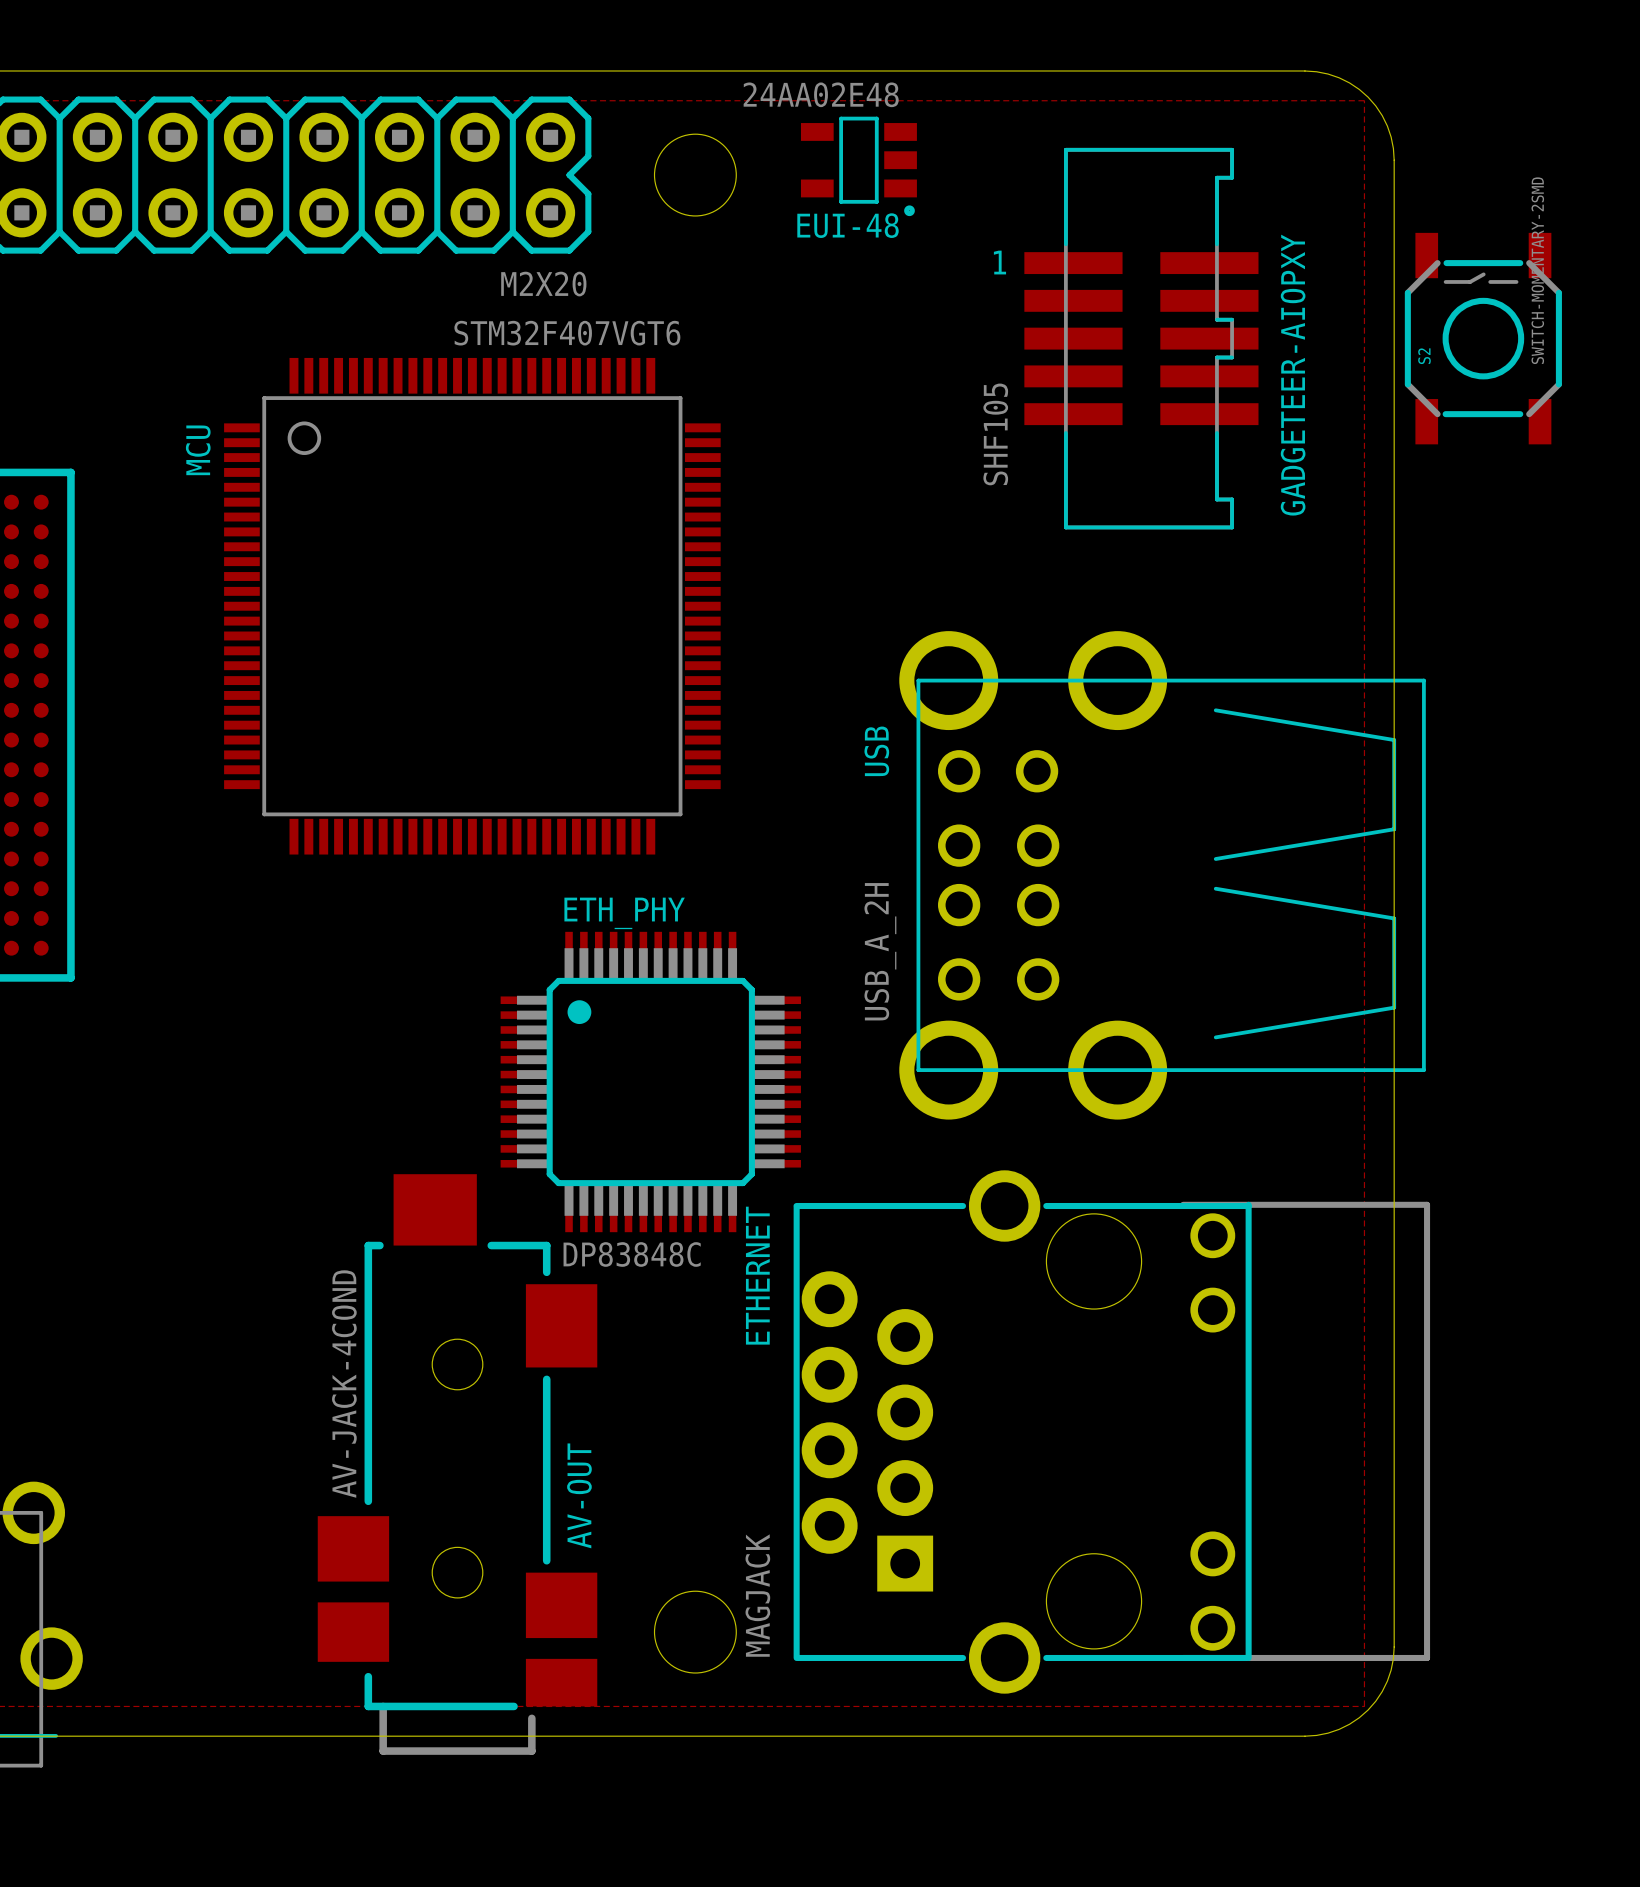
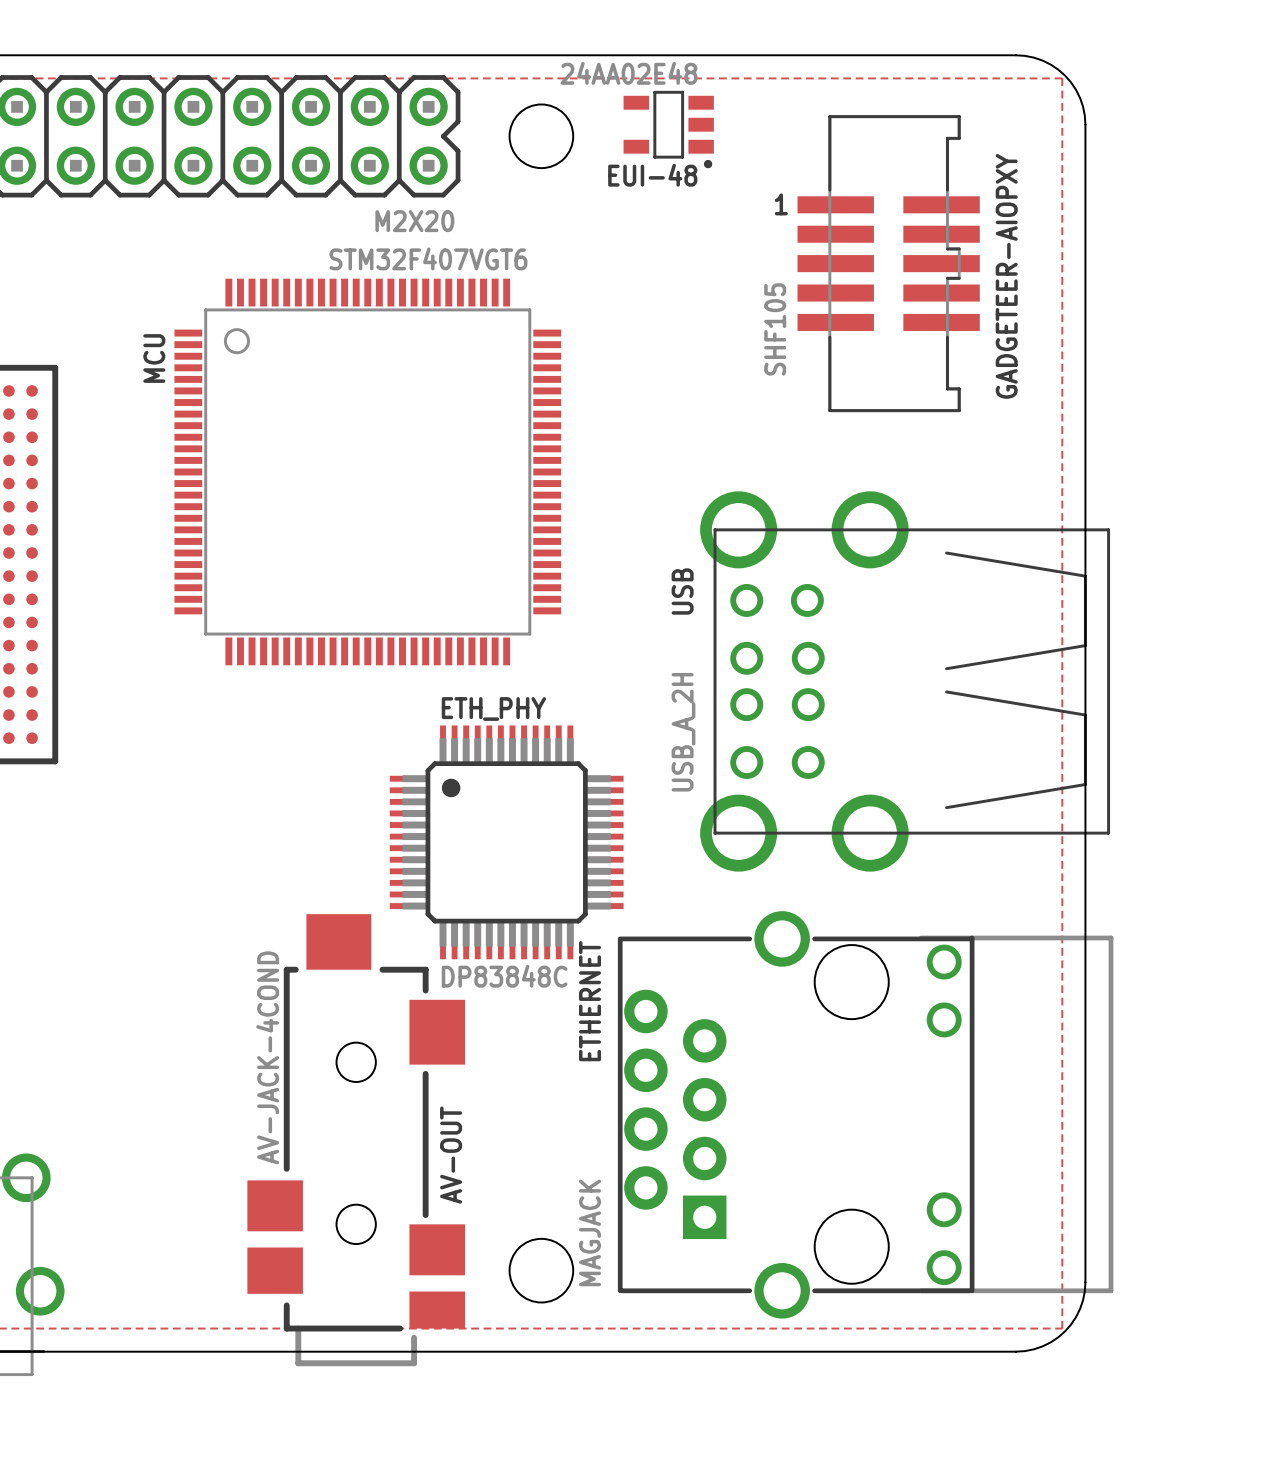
S2: SWITCH-MOMENTARY-2SMD (1483, 338) -> none

